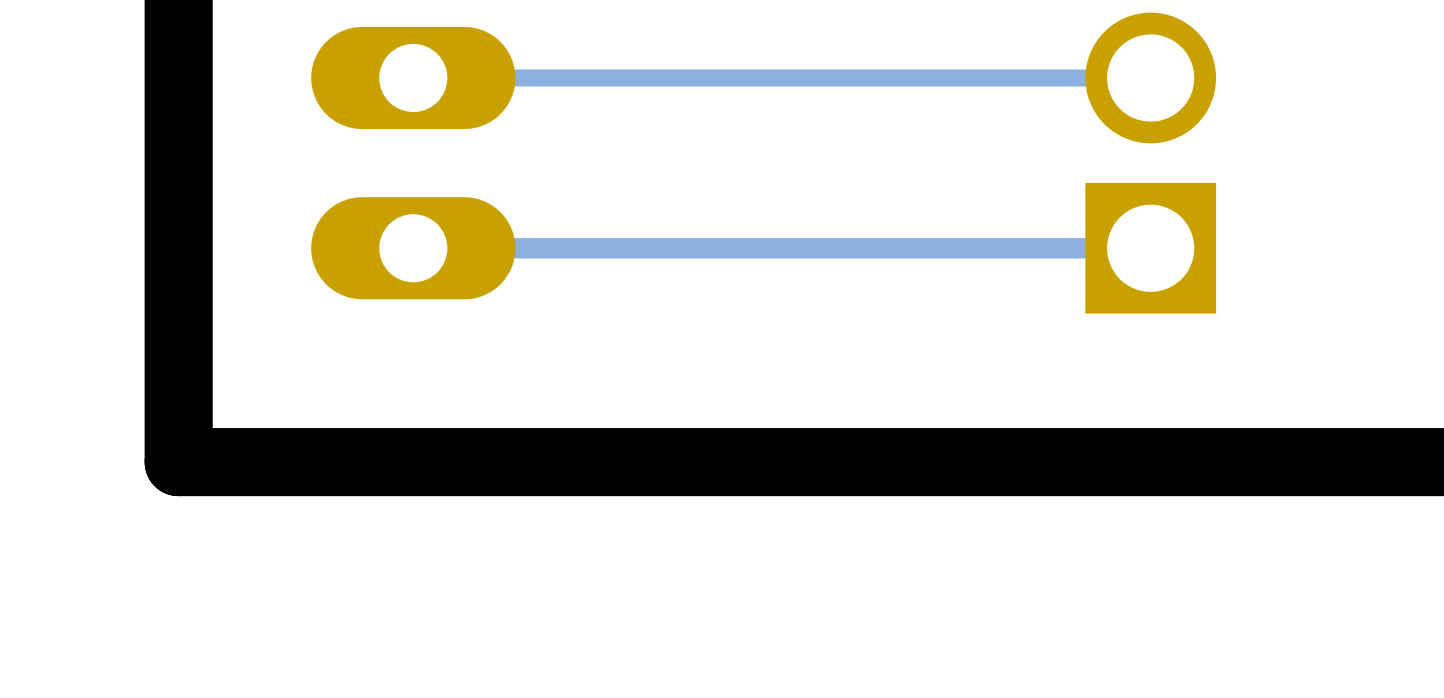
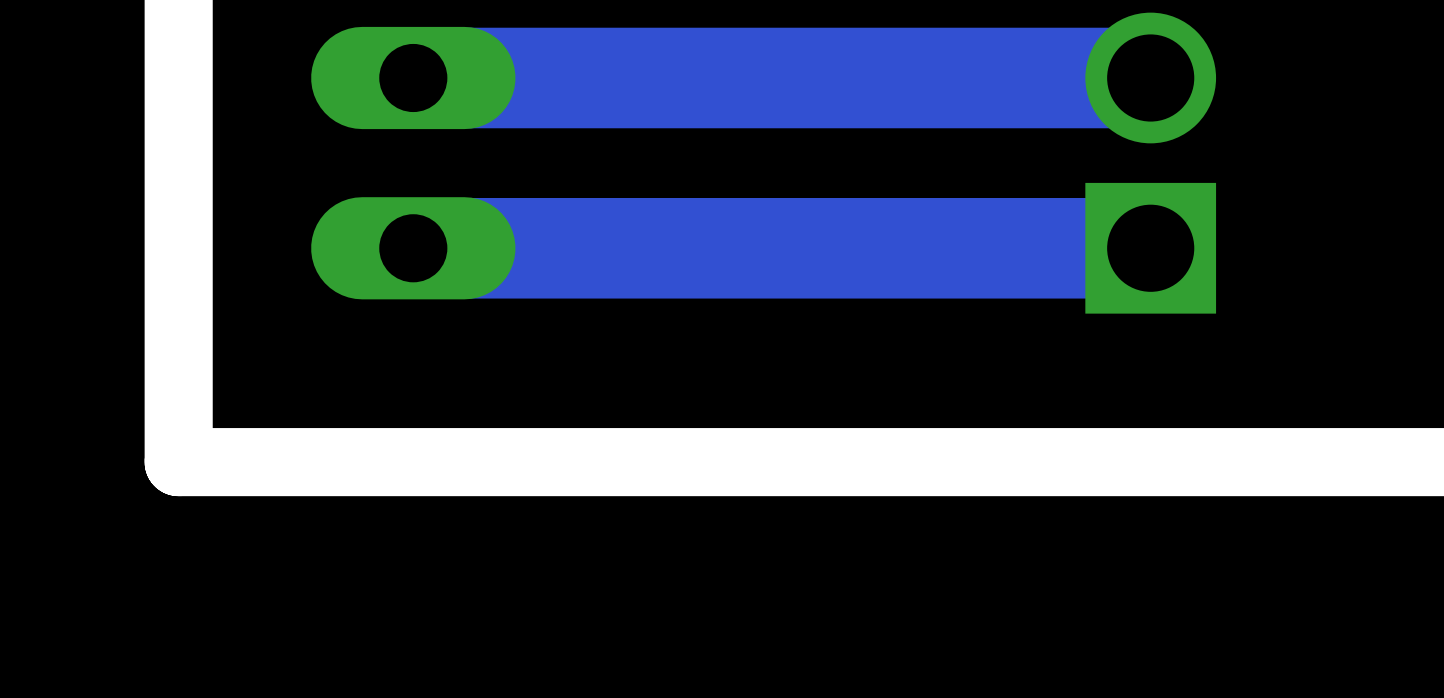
track width: thin (1150, 77) (413, 77) -> thick (1150, 77) (413, 77)
track width: thin (1150, 248) (413, 248) -> thick (1150, 248) (413, 248)

